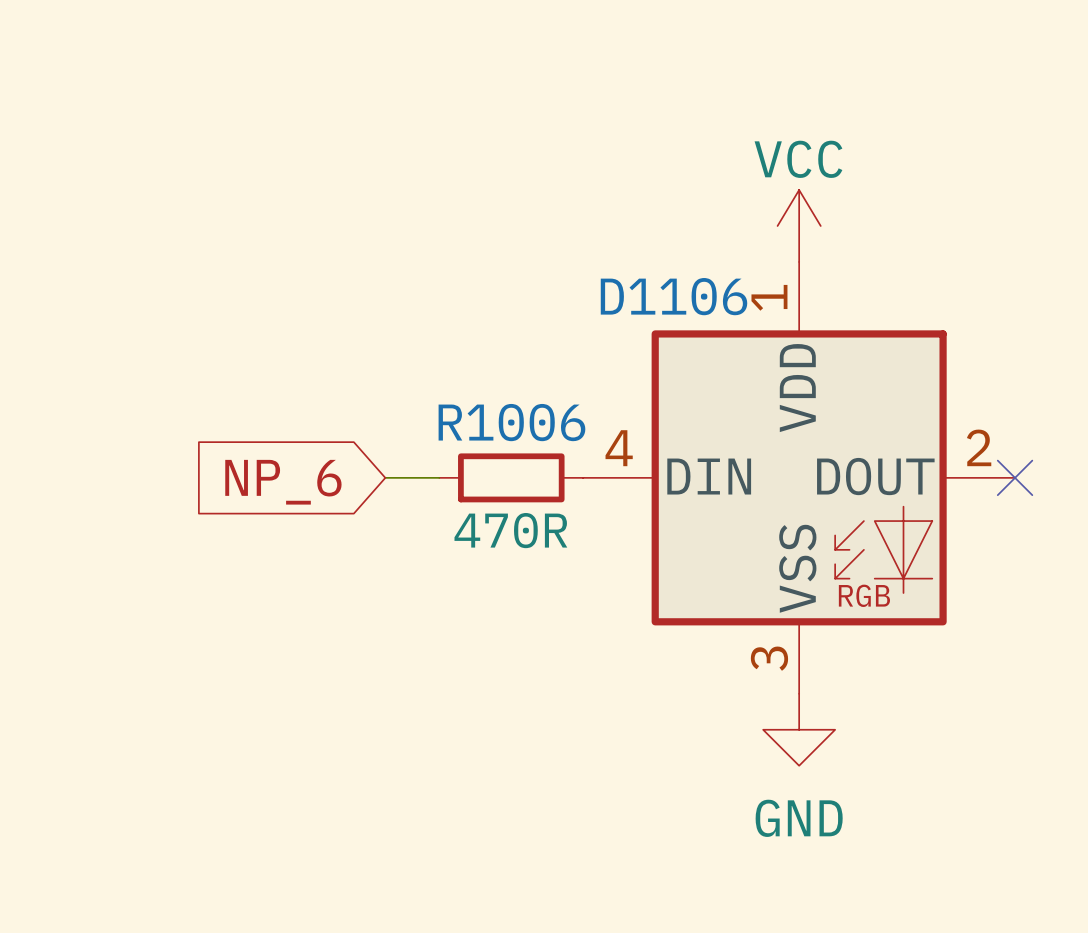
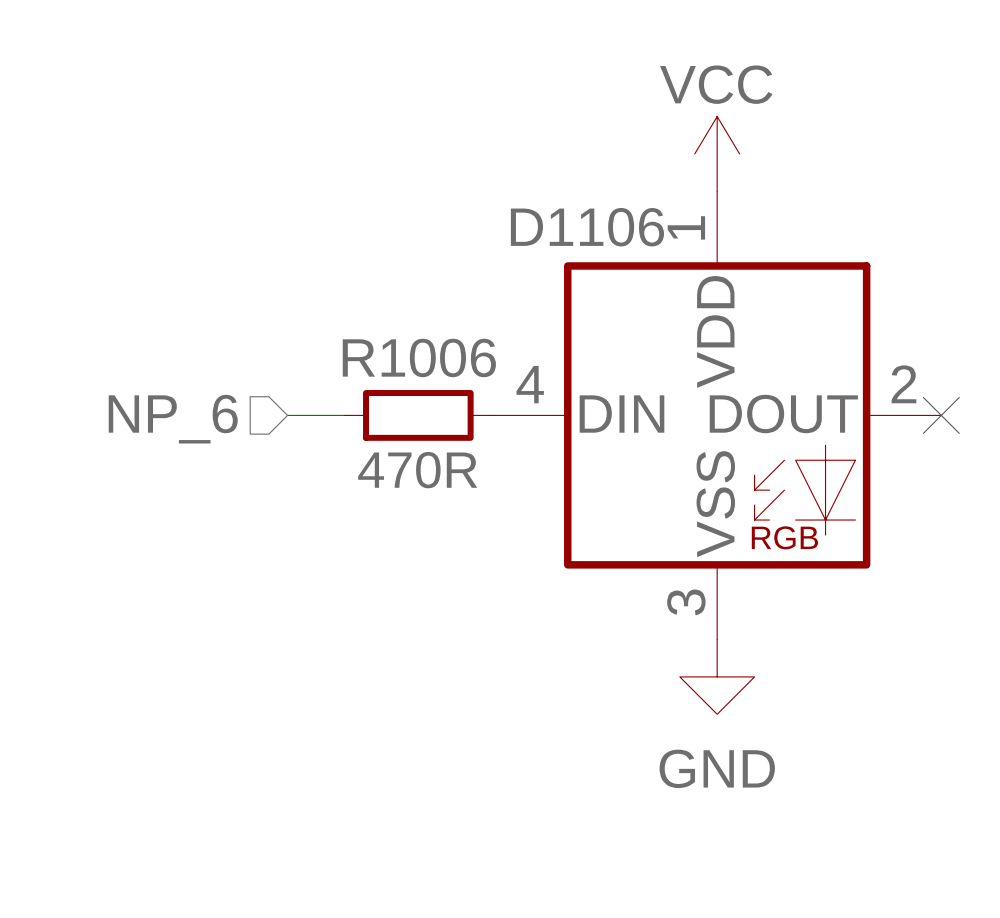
hierarchical label: none -> NP_6 (173, 419)
global label: NP_6 (283, 482) -> none

